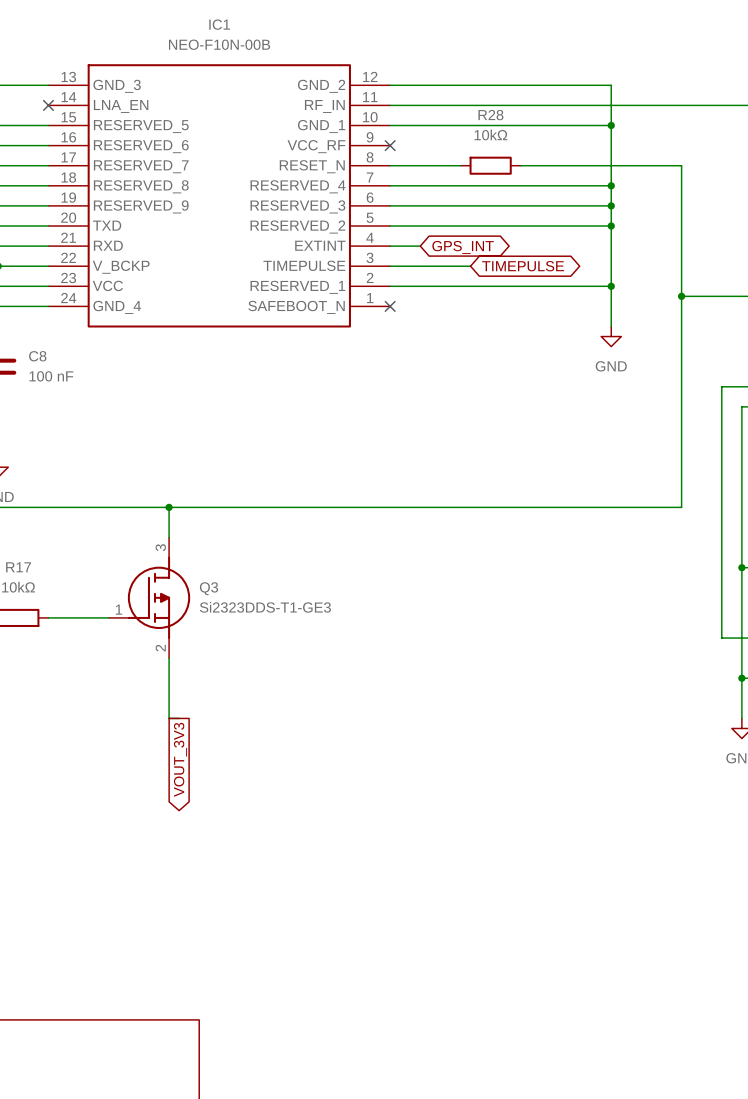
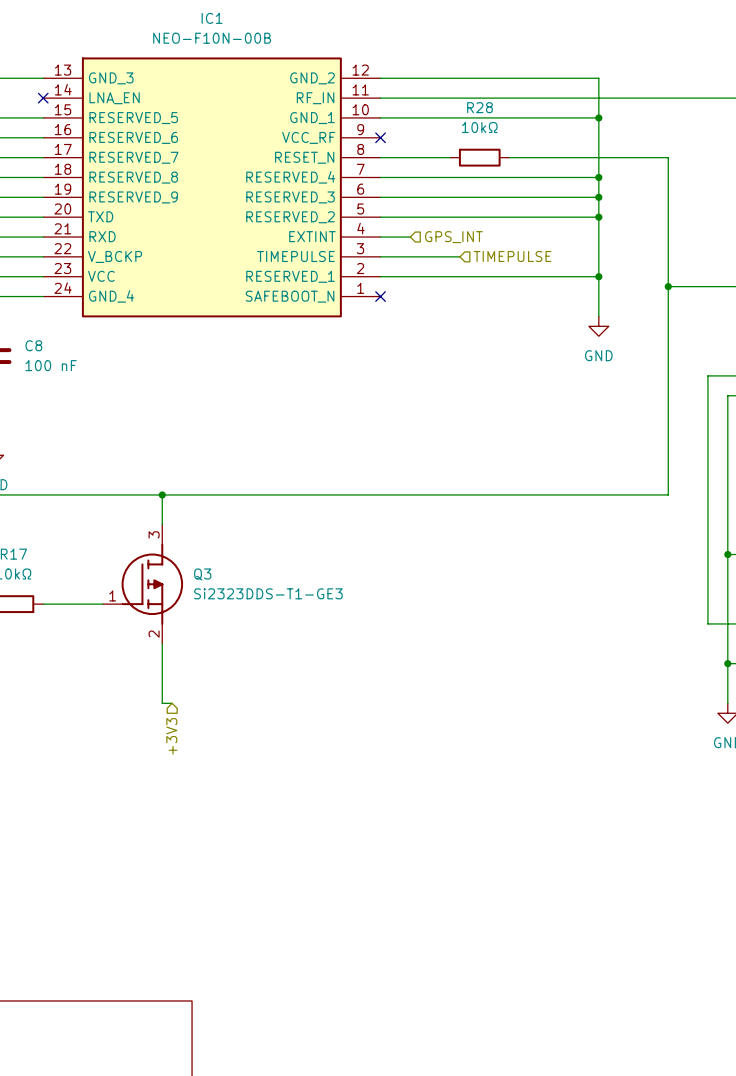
global label: GPS_INT (463, 247) -> none
hierarchical label: none -> GPS_INT (453, 237)
hierarchical label: none -> TIMEPULSE (512, 256)
global label: TIMEPULSE (523, 266) -> none
hierarchical label: none -> +3V3 (171, 736)
global label: VOUT_3V3 (180, 759) -> none

